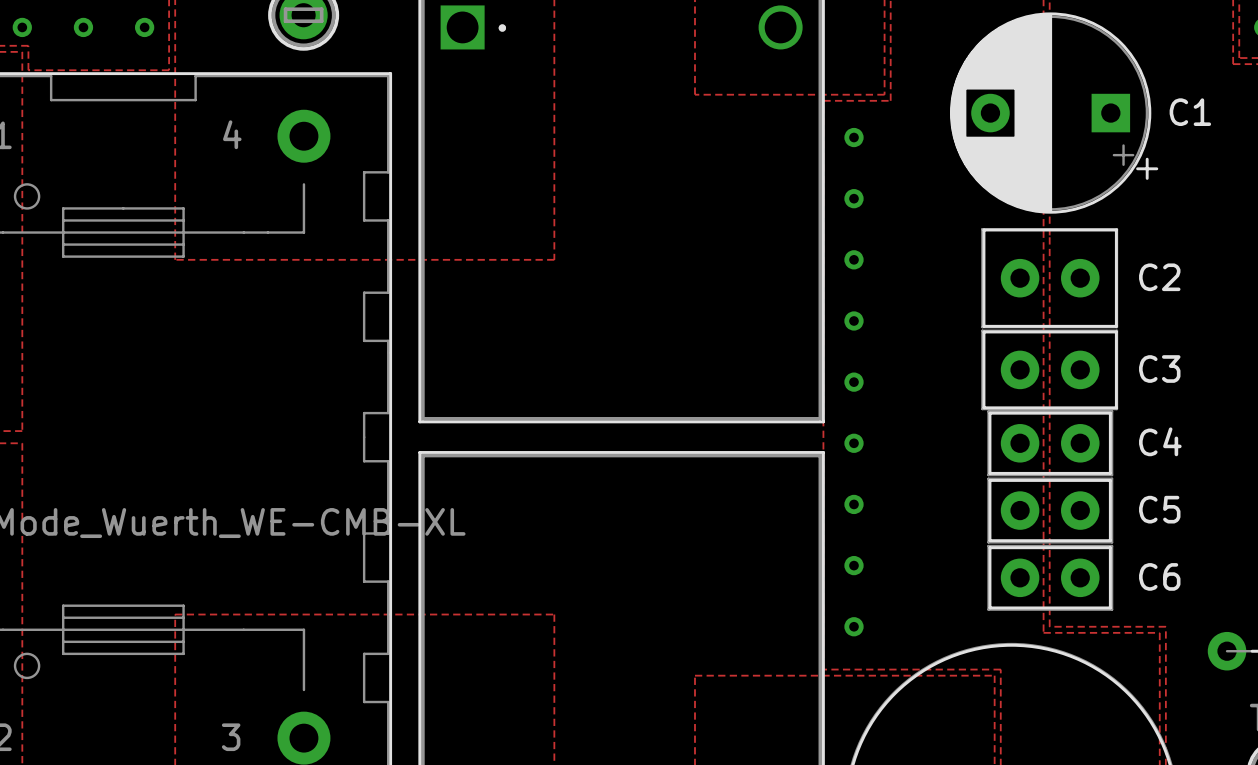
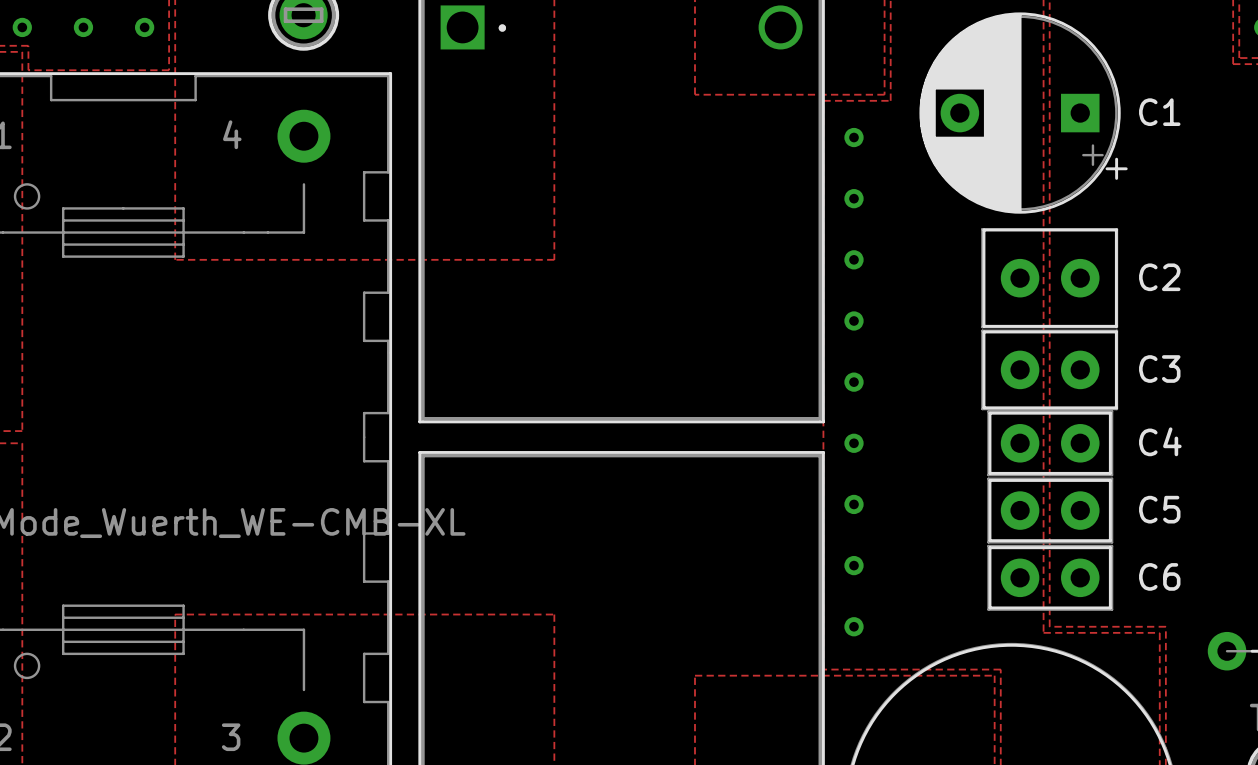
C1 position: (1054, 113) -> (1023, 113)

